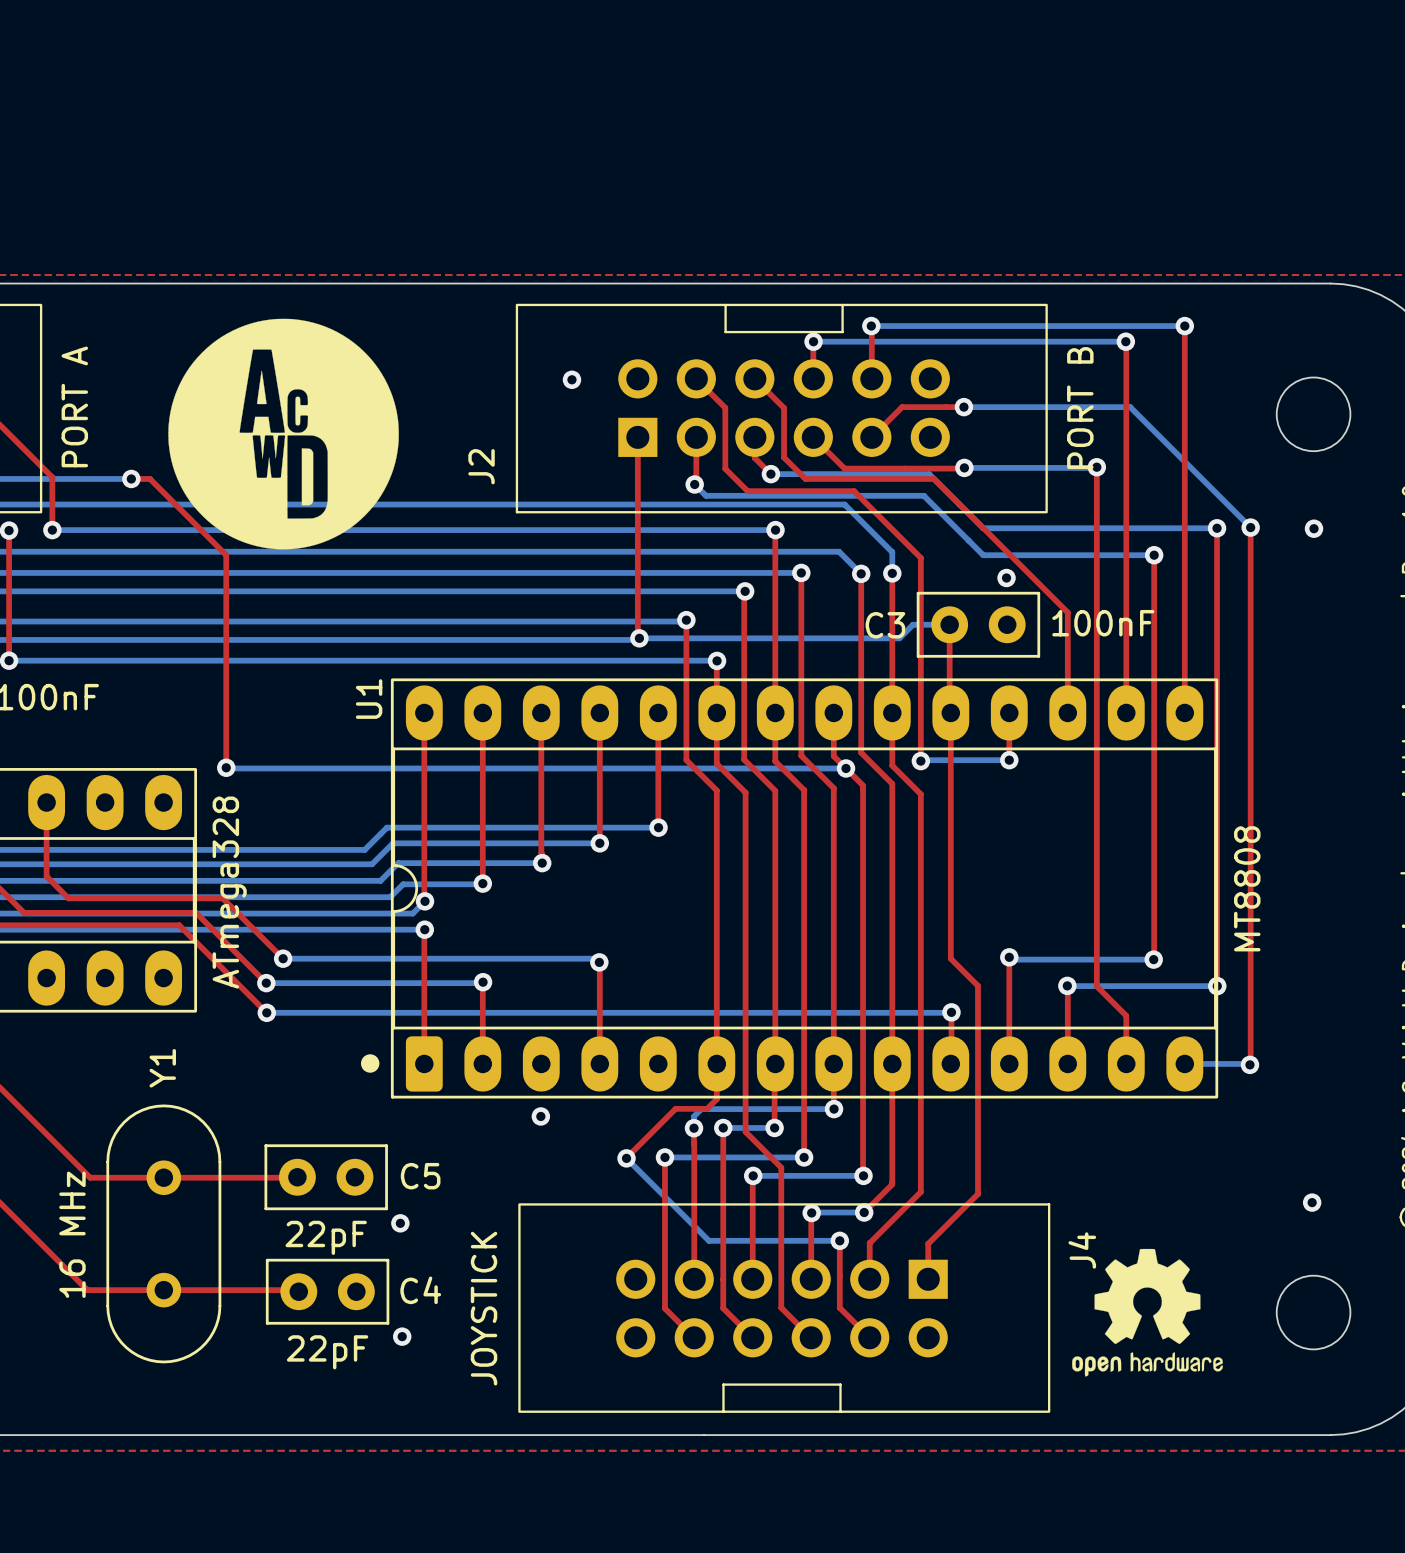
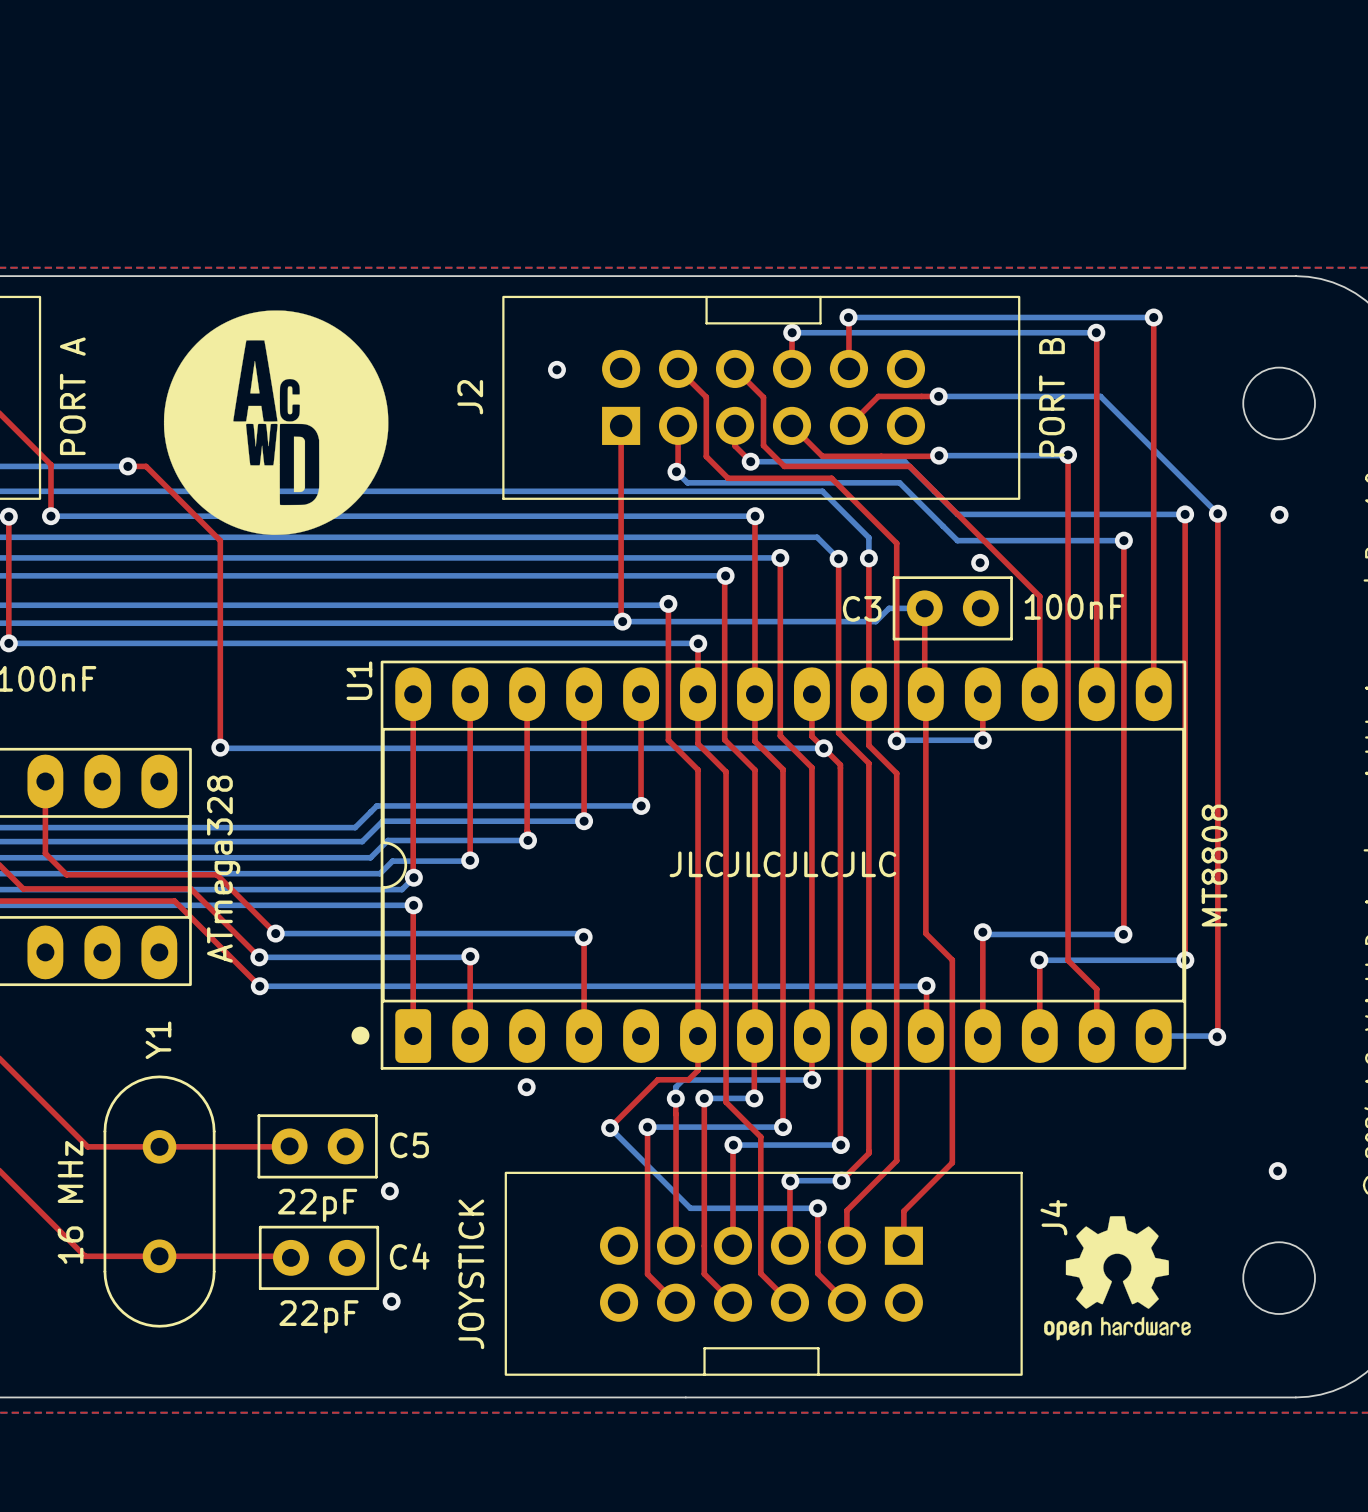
J2 name position: J2 (481, 466) -> J2 (470, 397)
text: none -> JLCJLCJLCJLC (782, 864)

